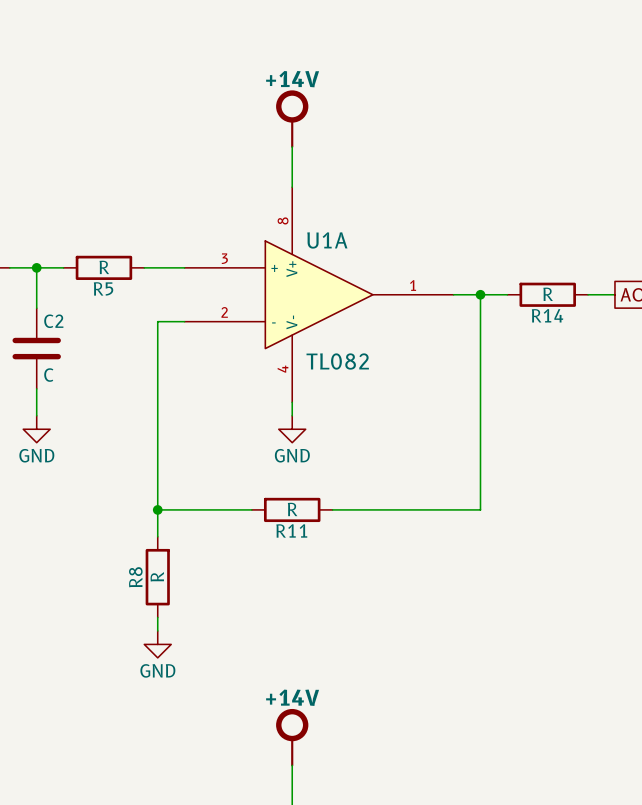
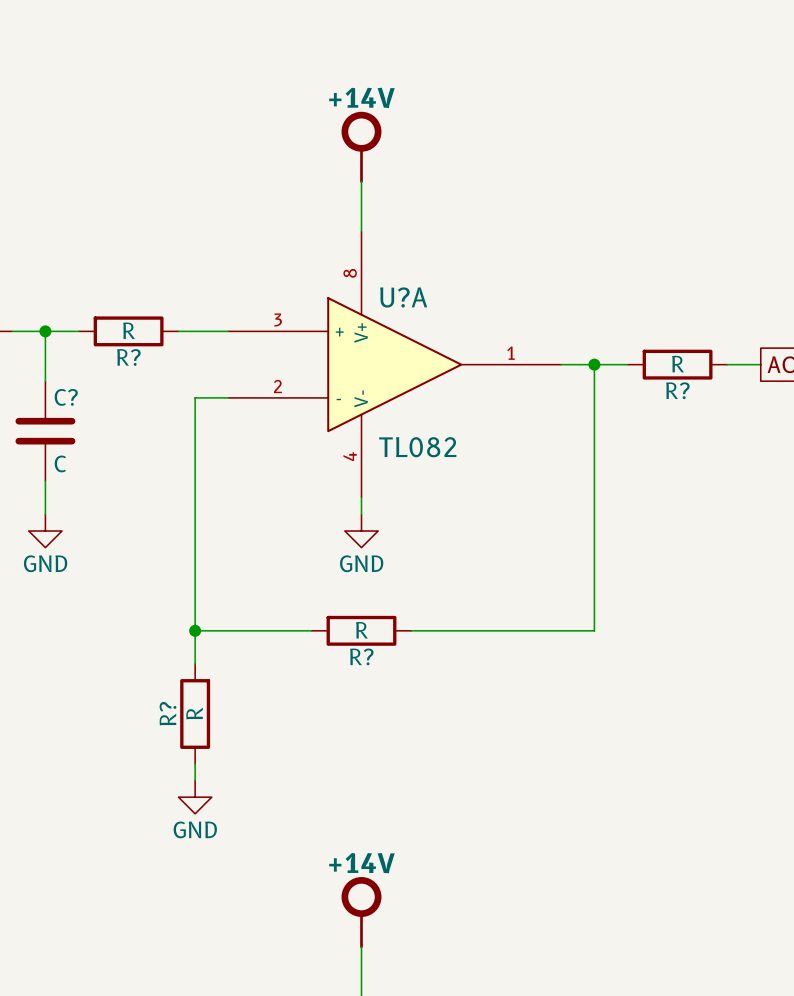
U1A name: U1A (327, 240) -> U?A (403, 297)
R5 name: R5 (103, 288) -> R? (128, 357)
R14 name: R14 (547, 315) -> R? (677, 390)
C2 name: C2 (53, 321) -> C? (66, 397)
R11 name: R11 (291, 530) -> R? (361, 656)
R8 name: R8 (135, 577) -> R? (167, 713)

